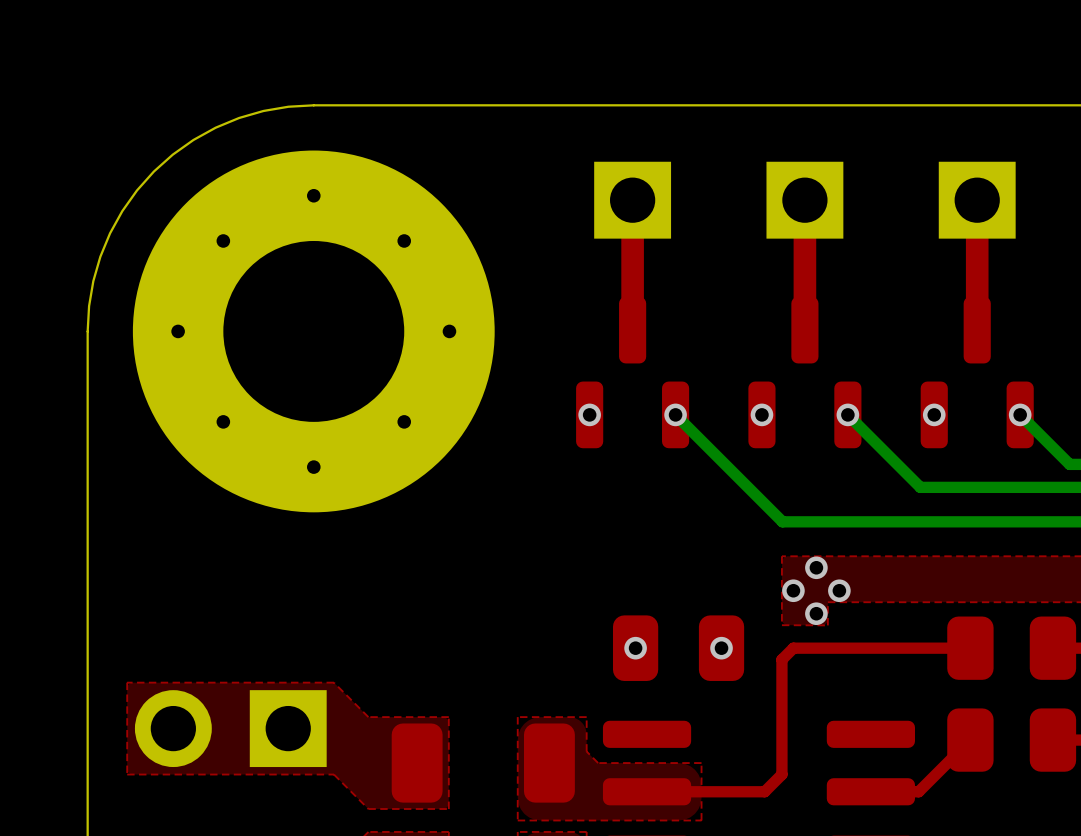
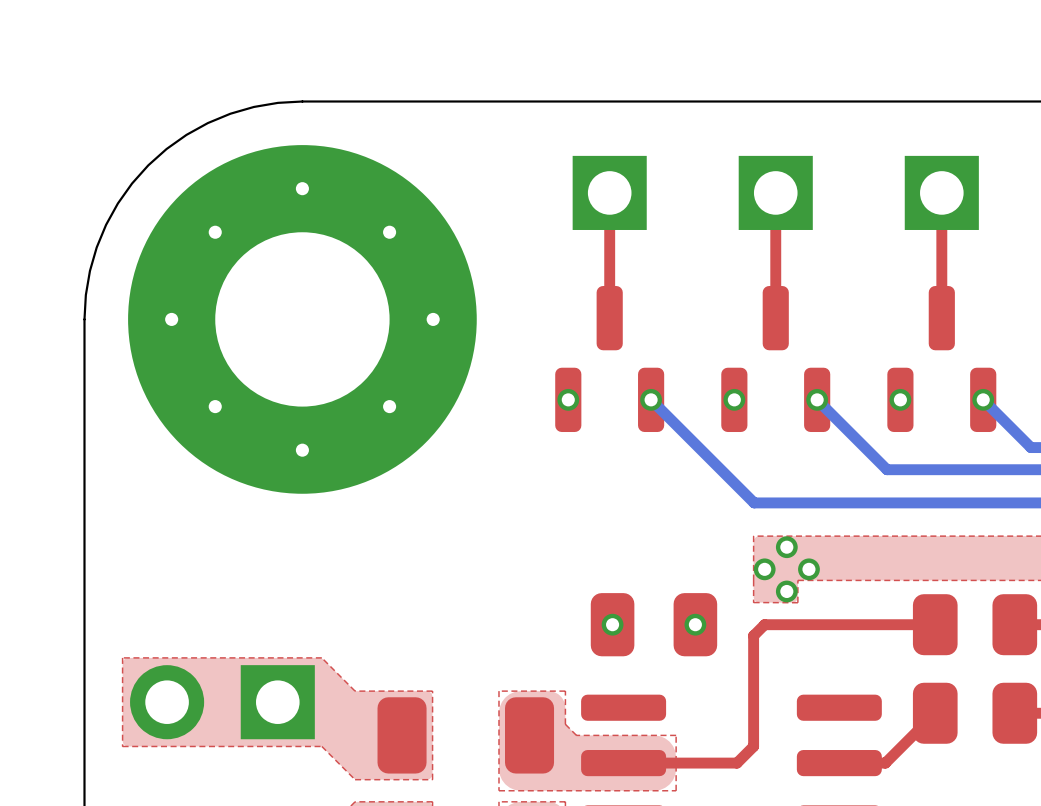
top track width: thick (632, 200) (632, 330) -> thin (609, 192) (609, 318)
top track width: thick (804, 200) (804, 330) -> thin (775, 192) (775, 318)
top track width: thick (977, 200) (977, 330) -> thin (941, 192) (941, 318)

